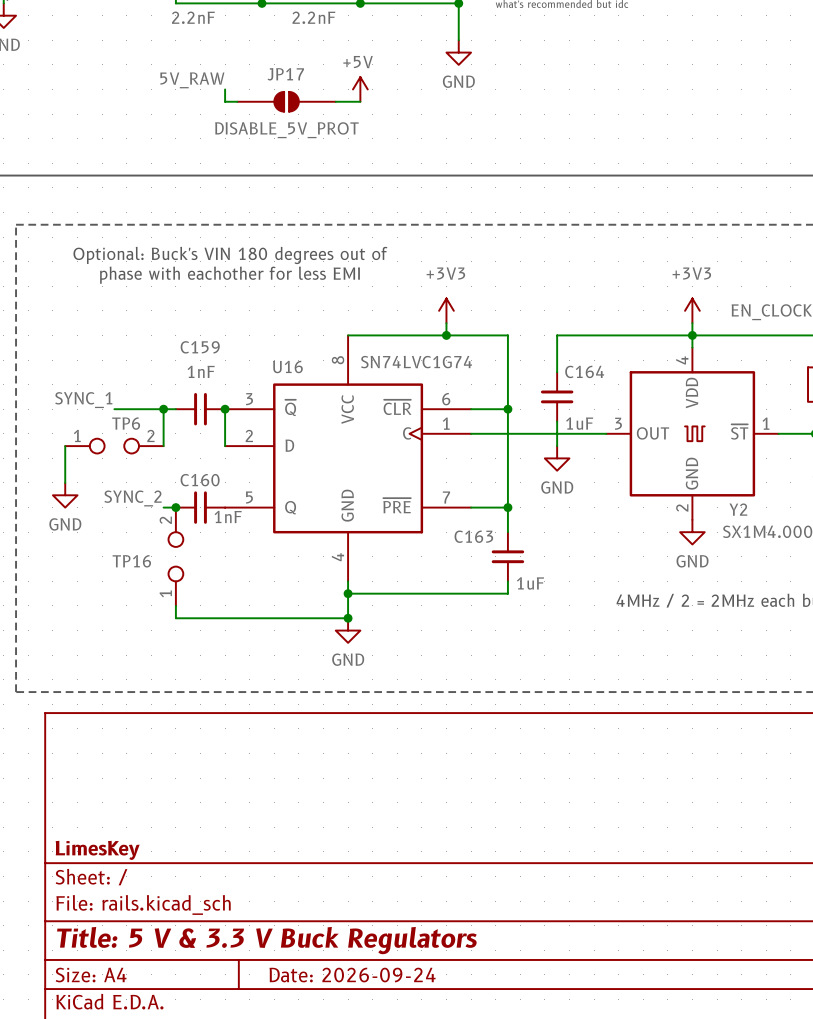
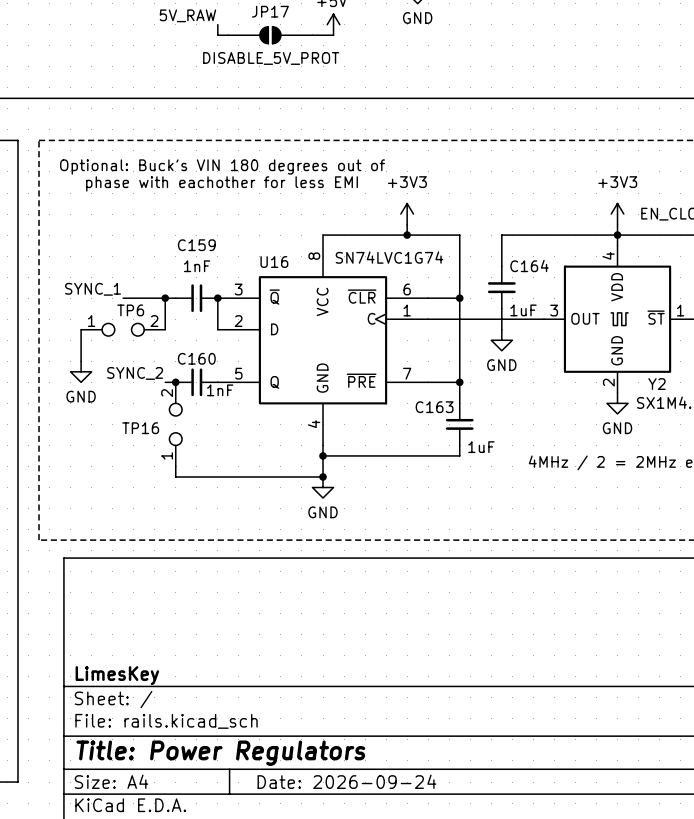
title block: Title: 5 V & 3.3 V Buck Regulators (266, 940) -> Title: Power Regulators (220, 753)

